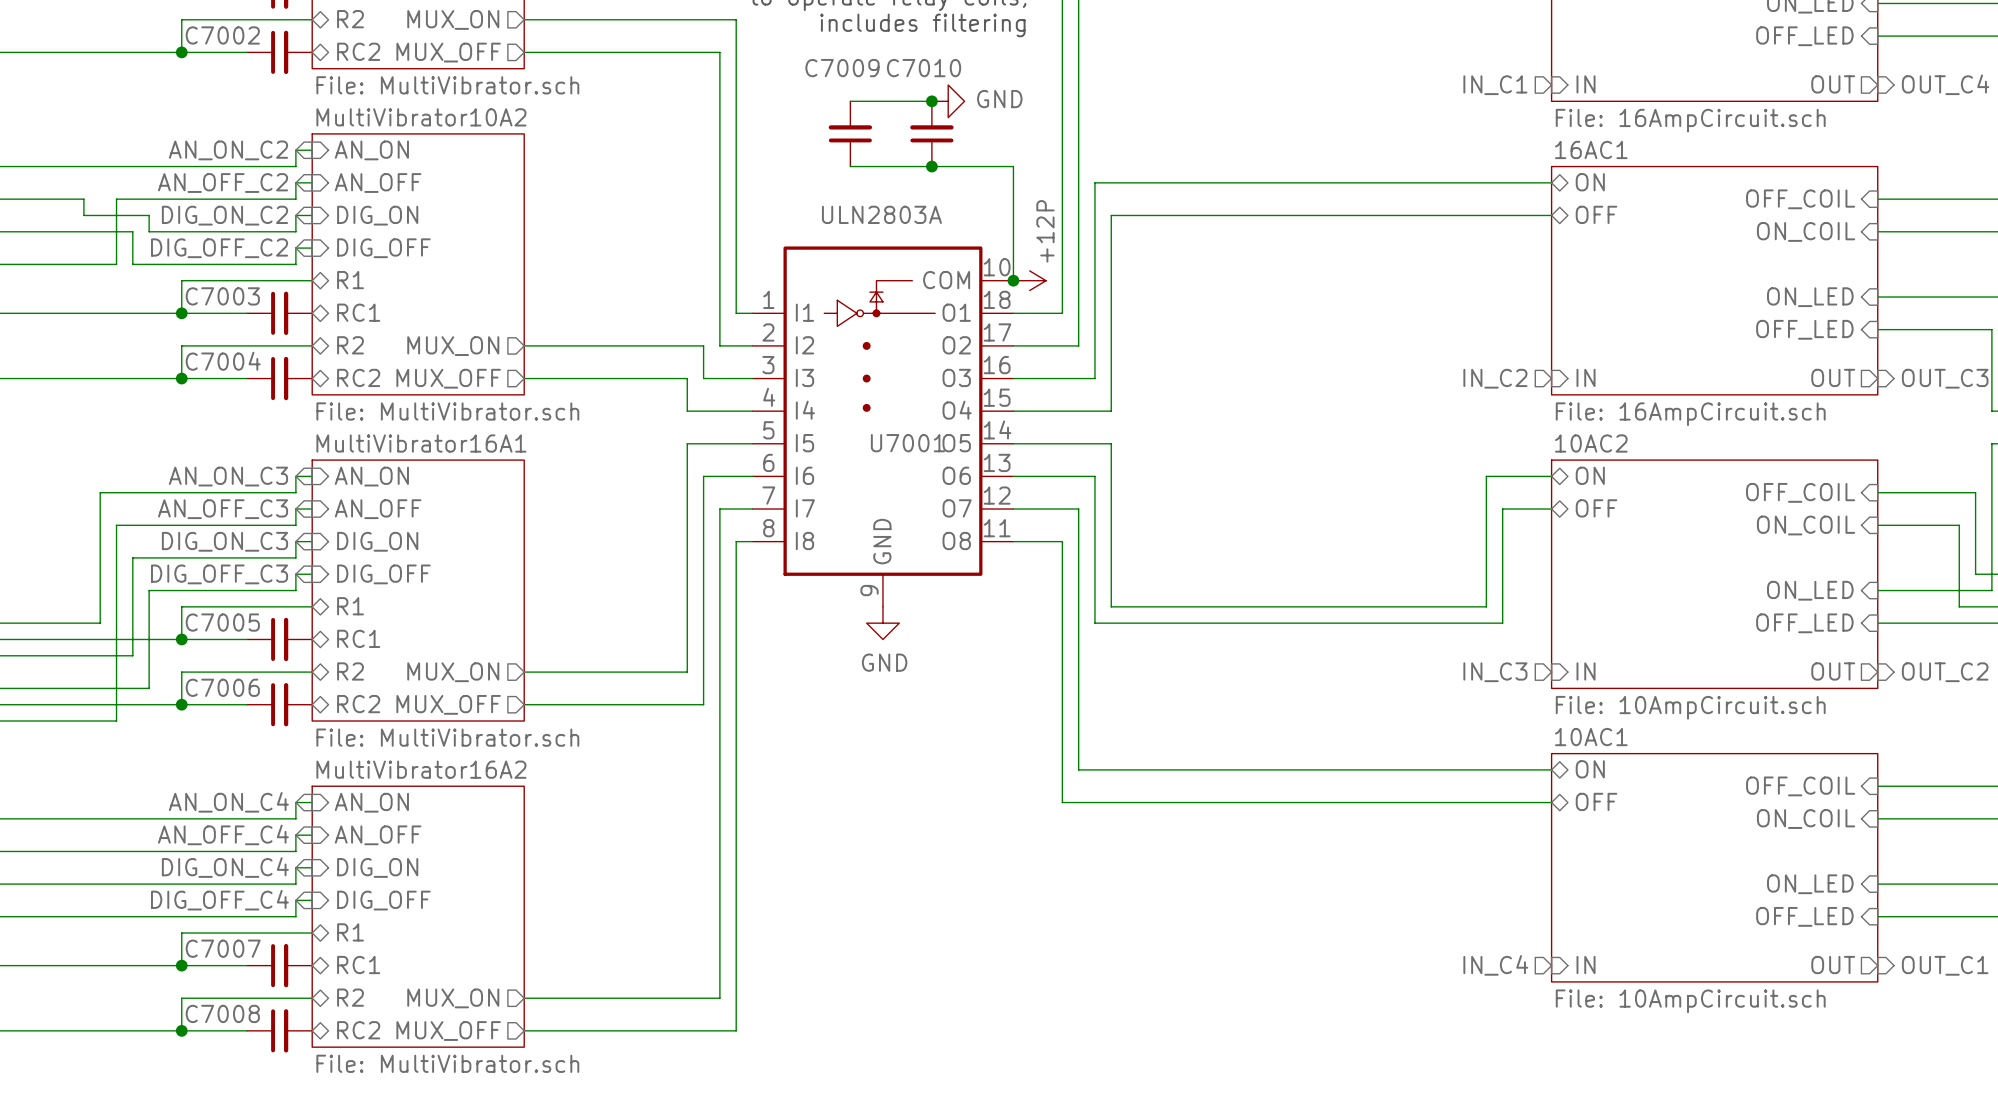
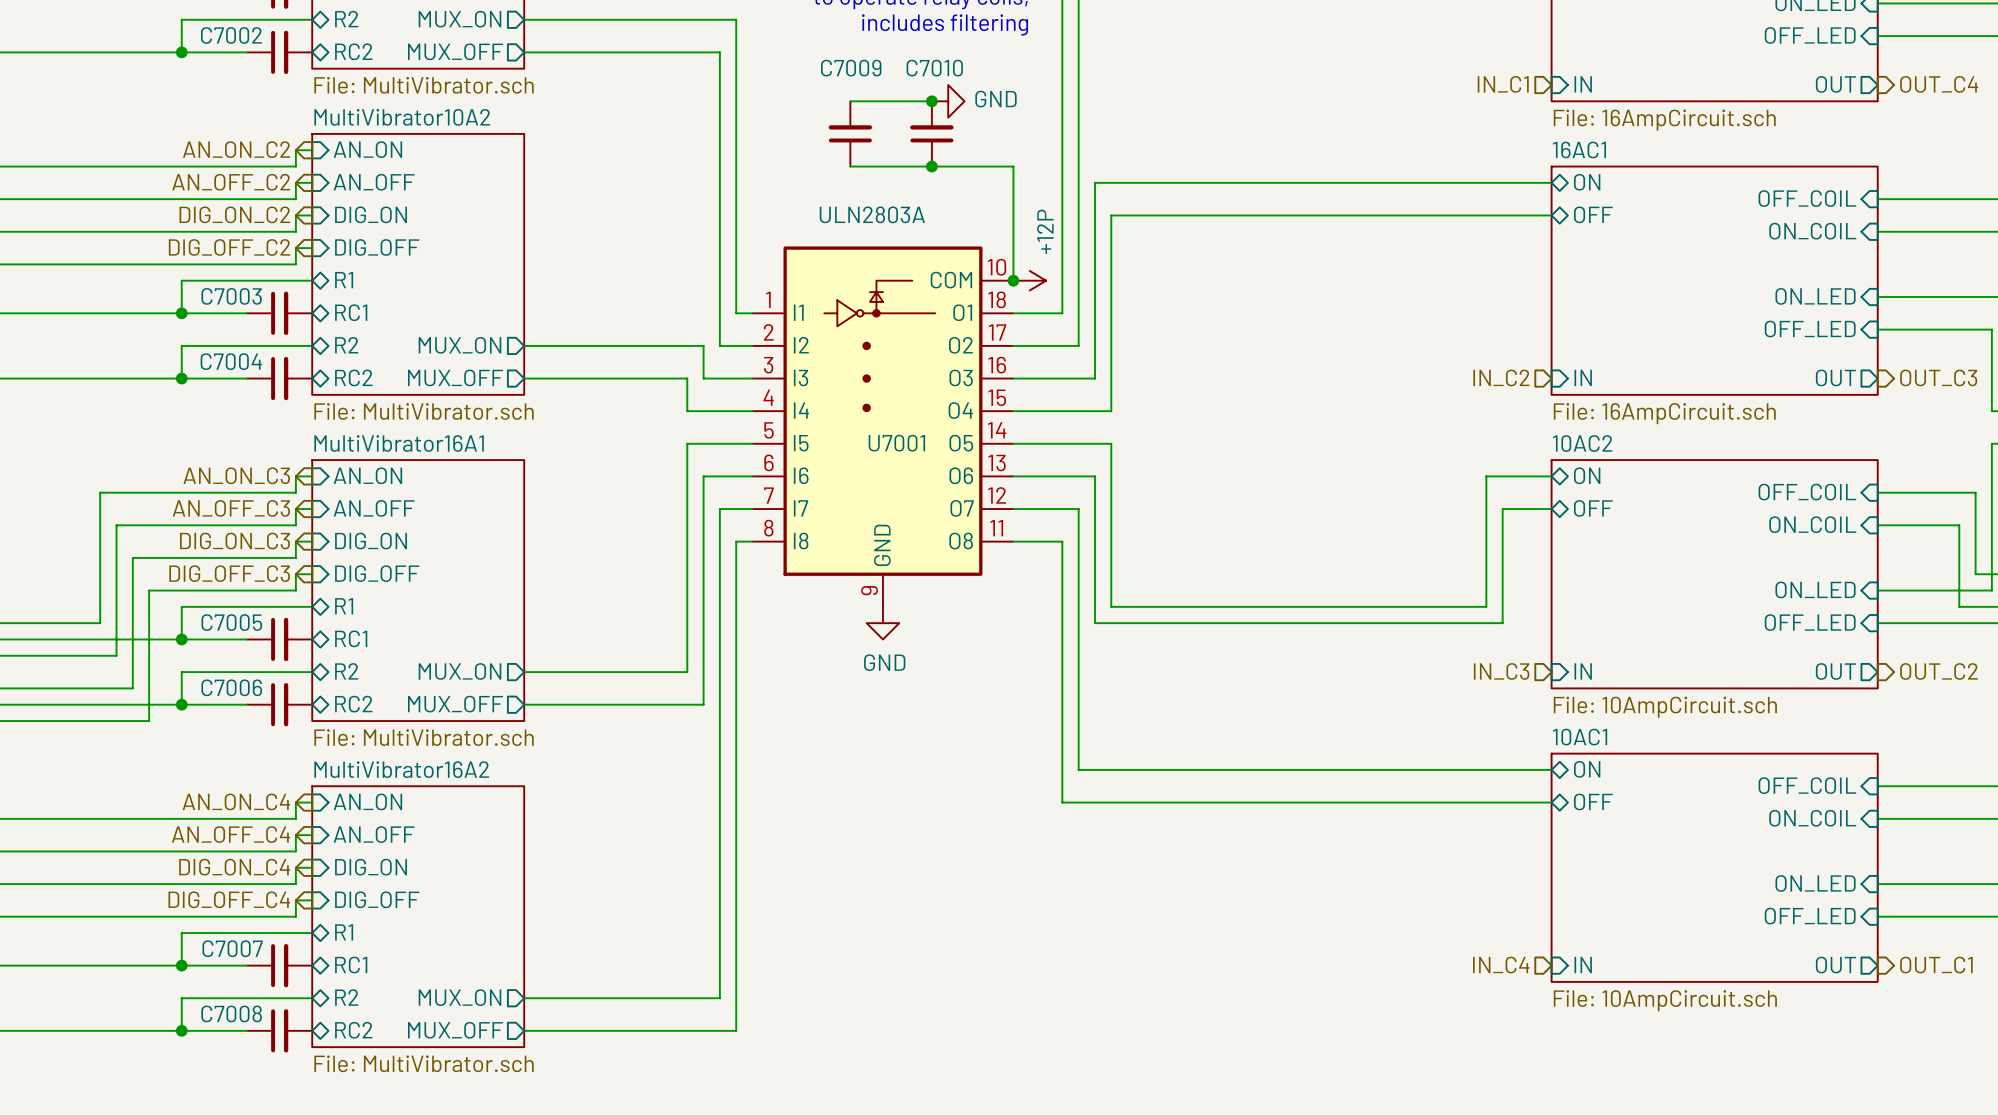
wire: (83, 199) (83, 215) (149, 215) (149, 231) -> (83, 199) (116, 199)
wire: (116, 199) (116, 264) -> (132, 264) (116, 264)
wire: (132, 231) (132, 264) -> (132, 231) (149, 231)
wire: (132, 655) (116, 655) (116, 721) -> (149, 688) (149, 721) (116, 721)
wire: (132, 688) (149, 688) -> (132, 688) (132, 655)

